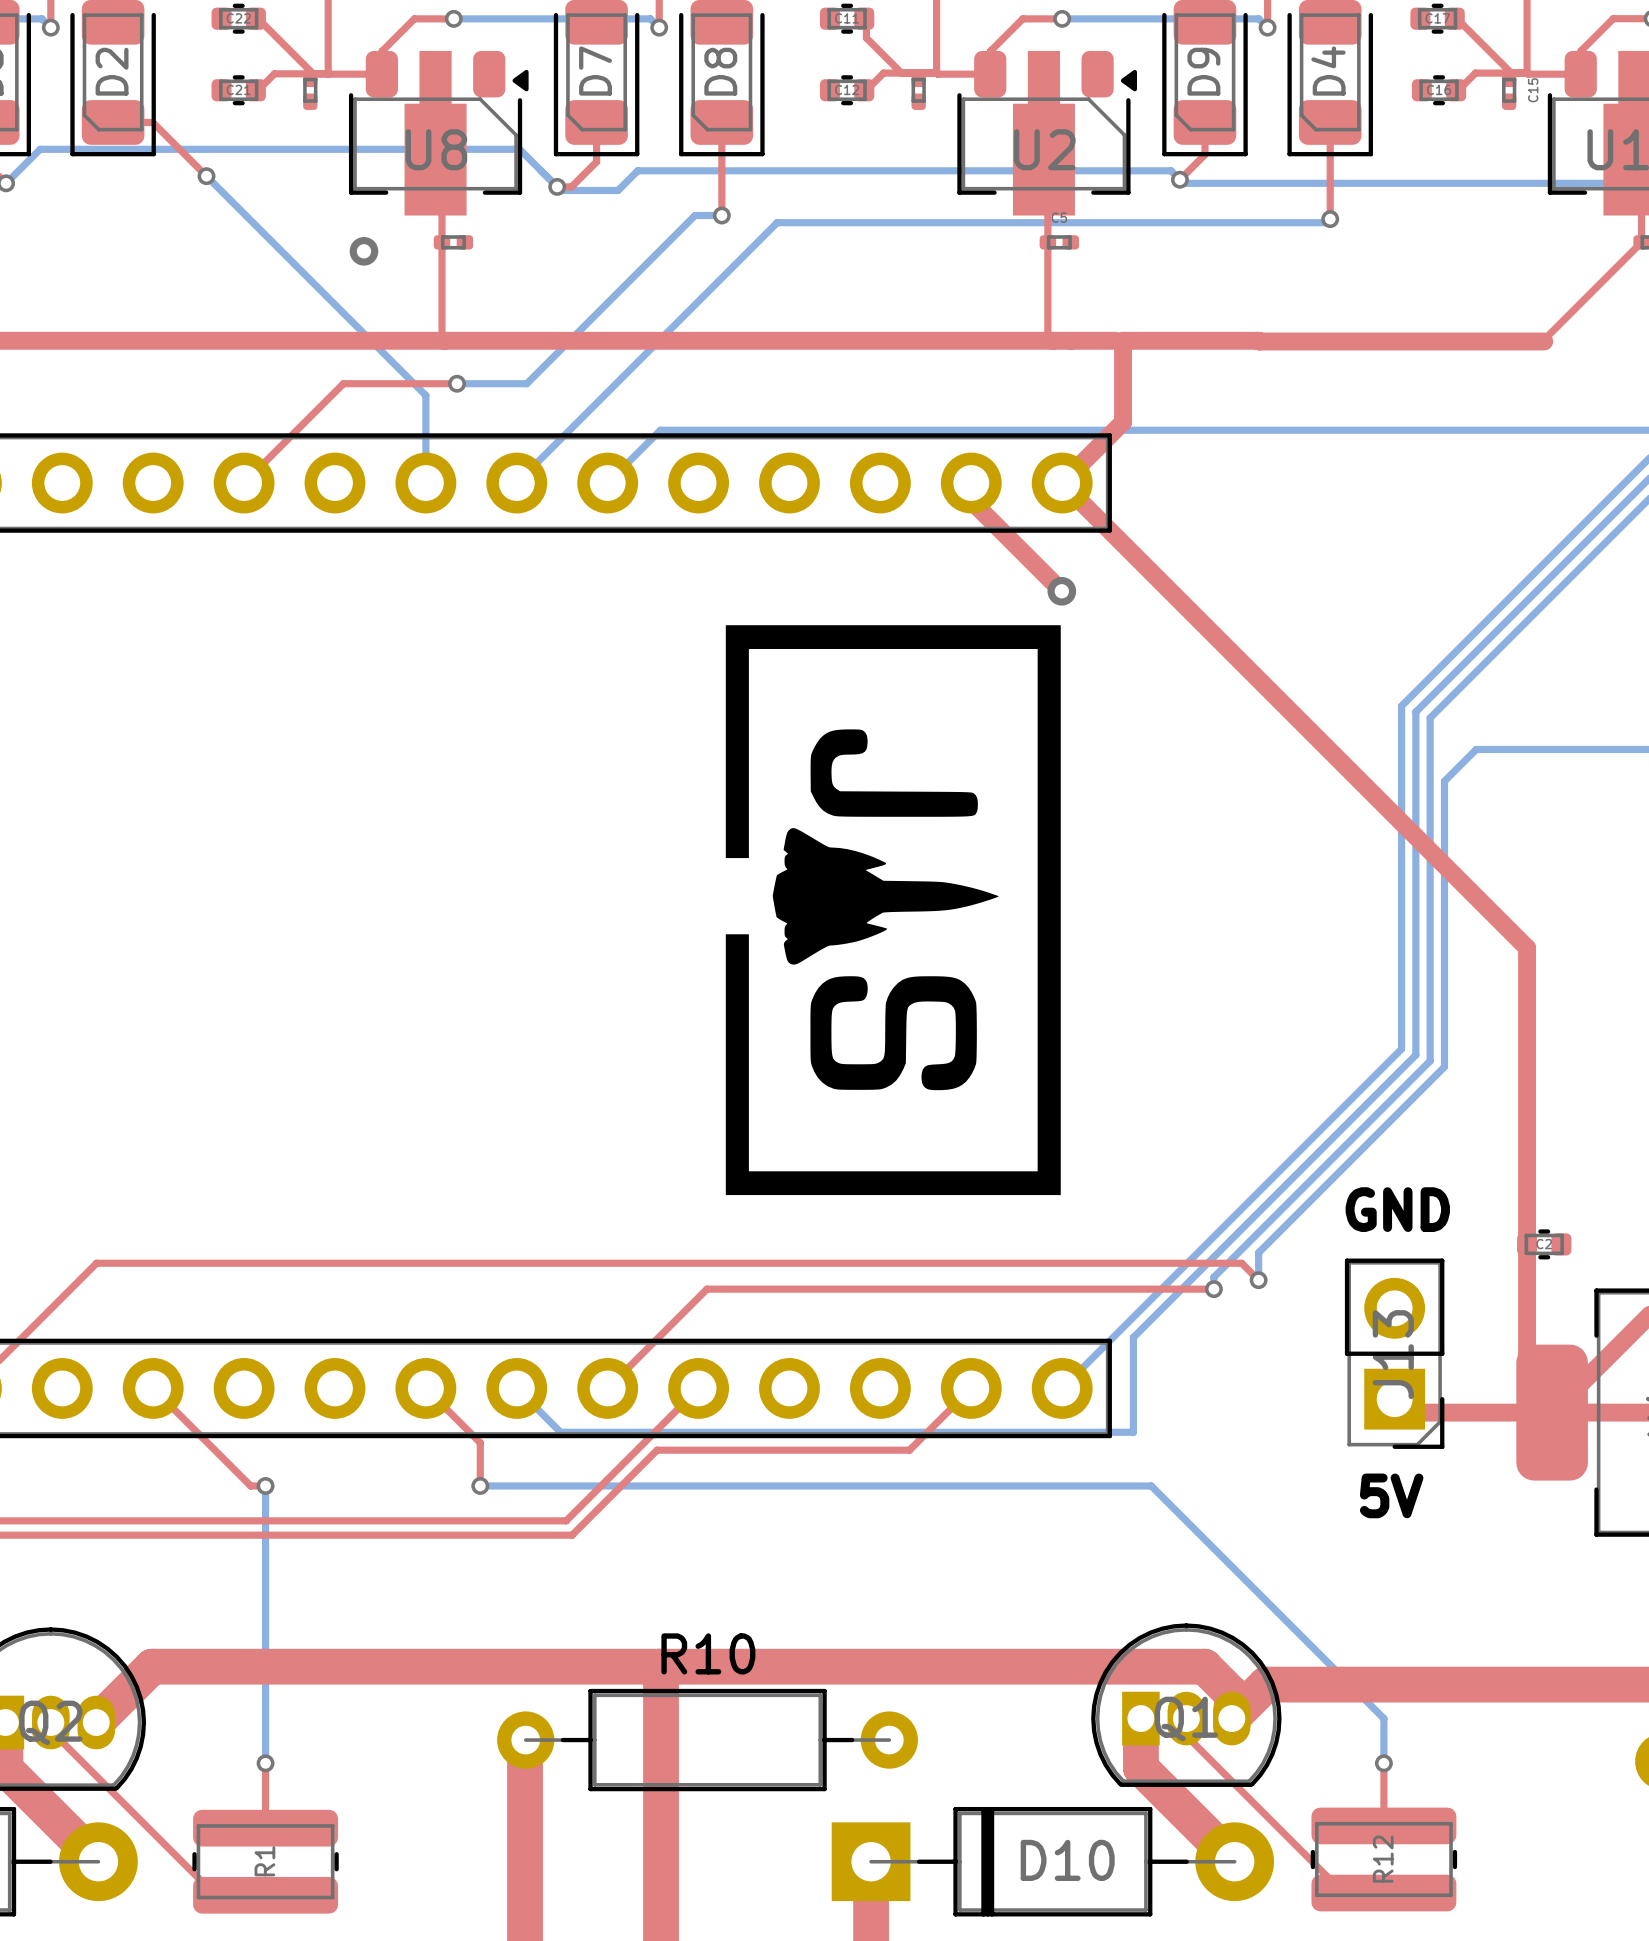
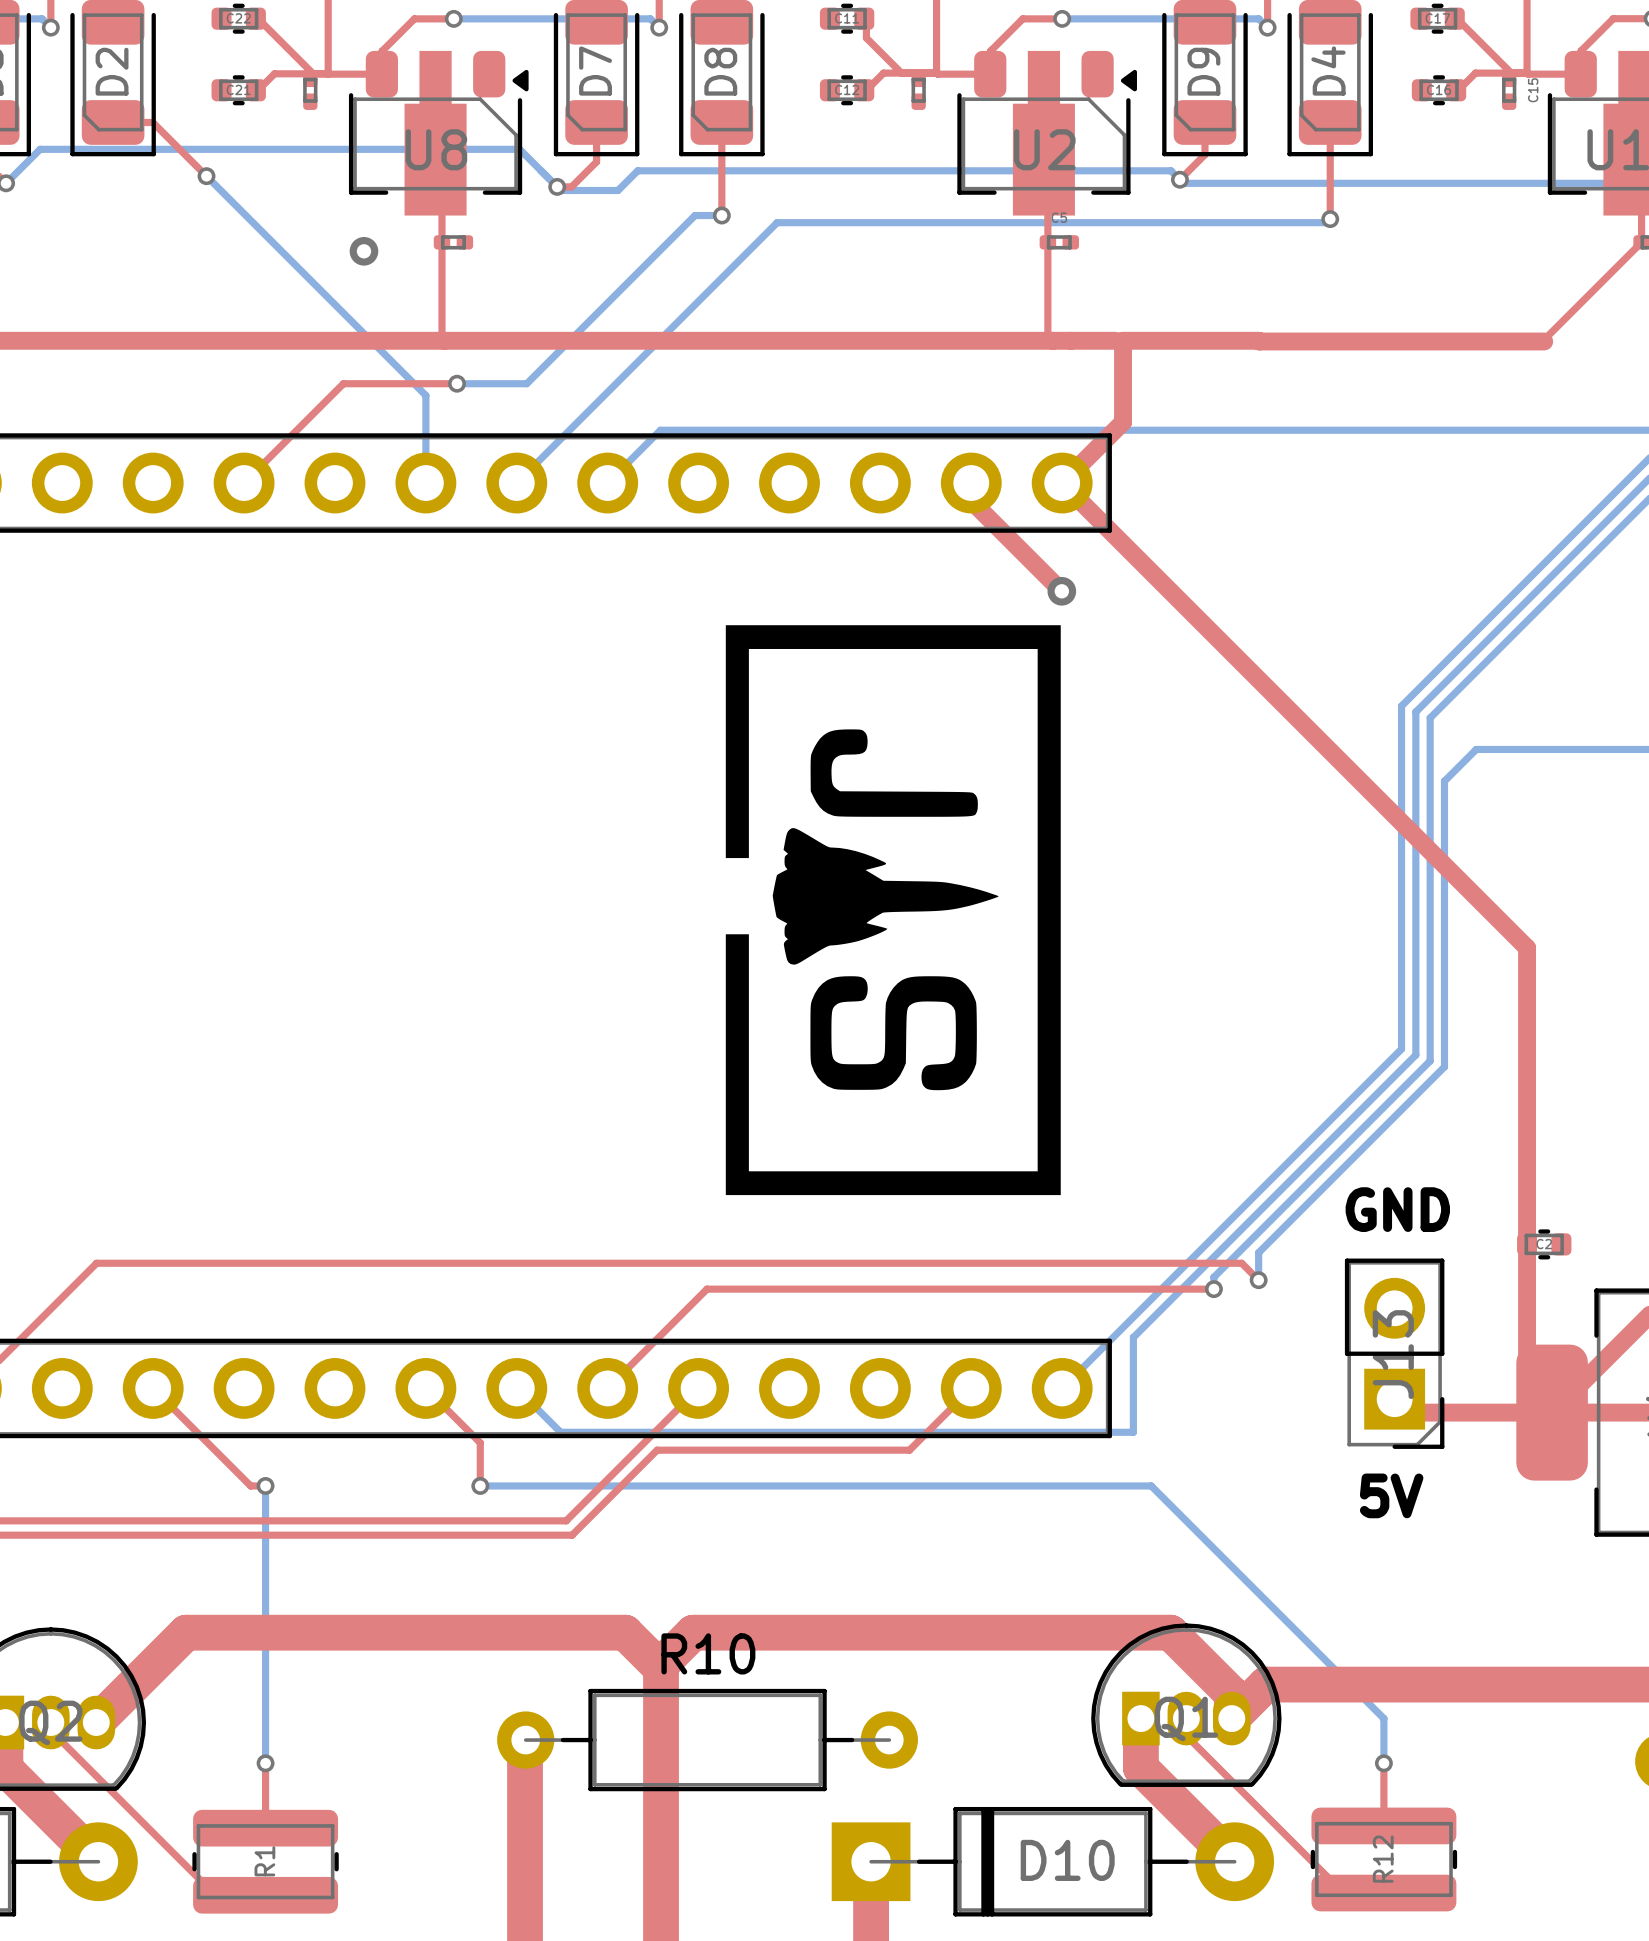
top track: (152, 1666) (1204, 1666) -> (152, 1666) (186, 1632) (625, 1632) (659, 1666) (693, 1632) (1170, 1632) (1204, 1666)

